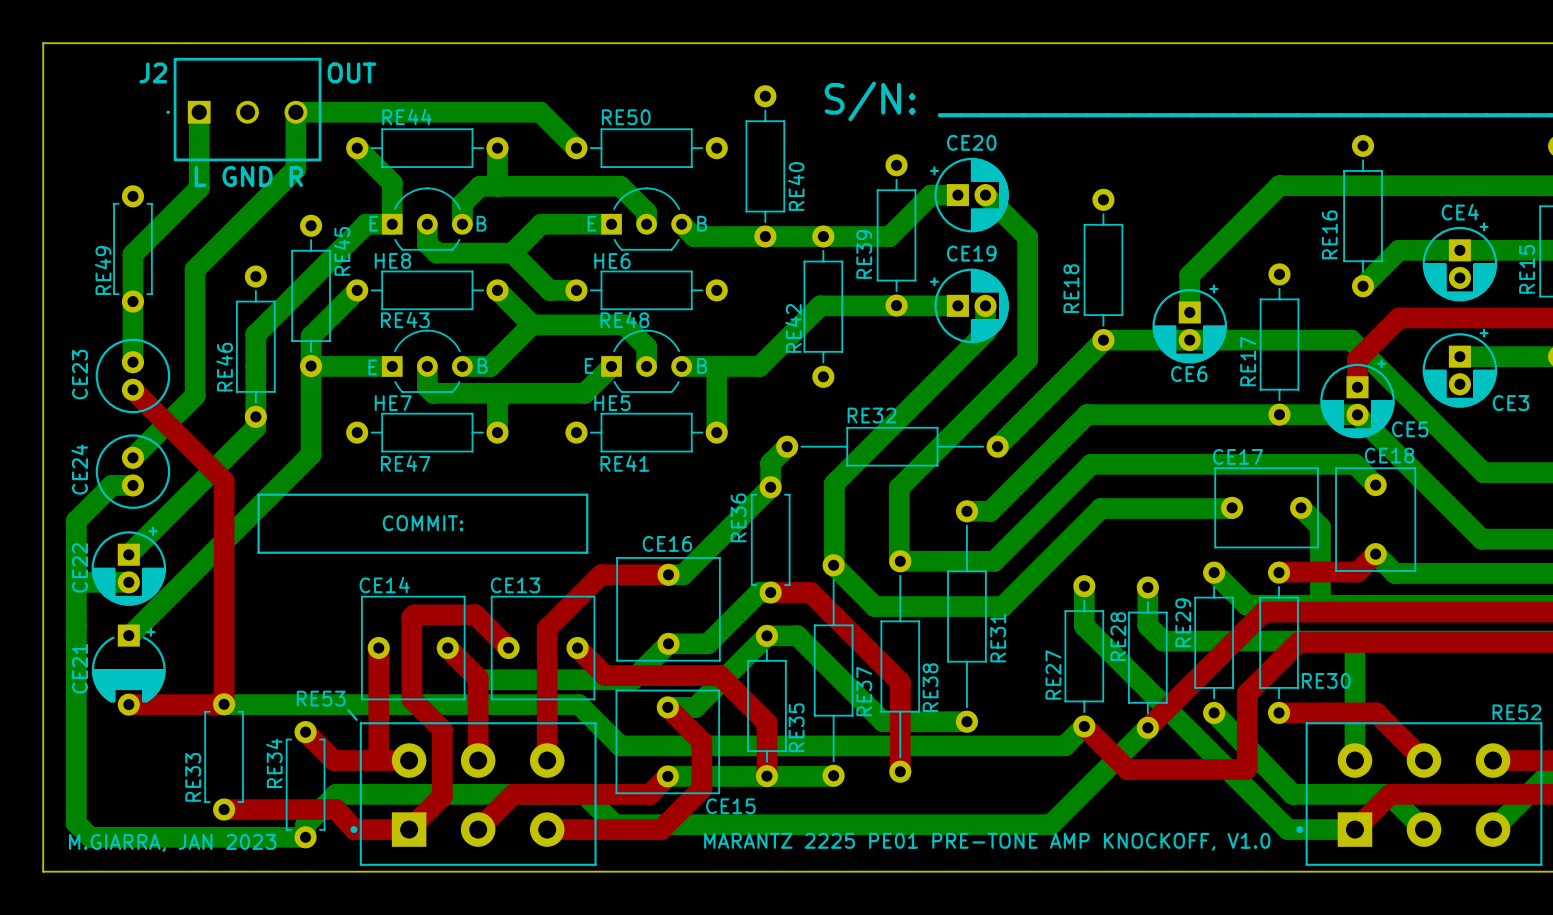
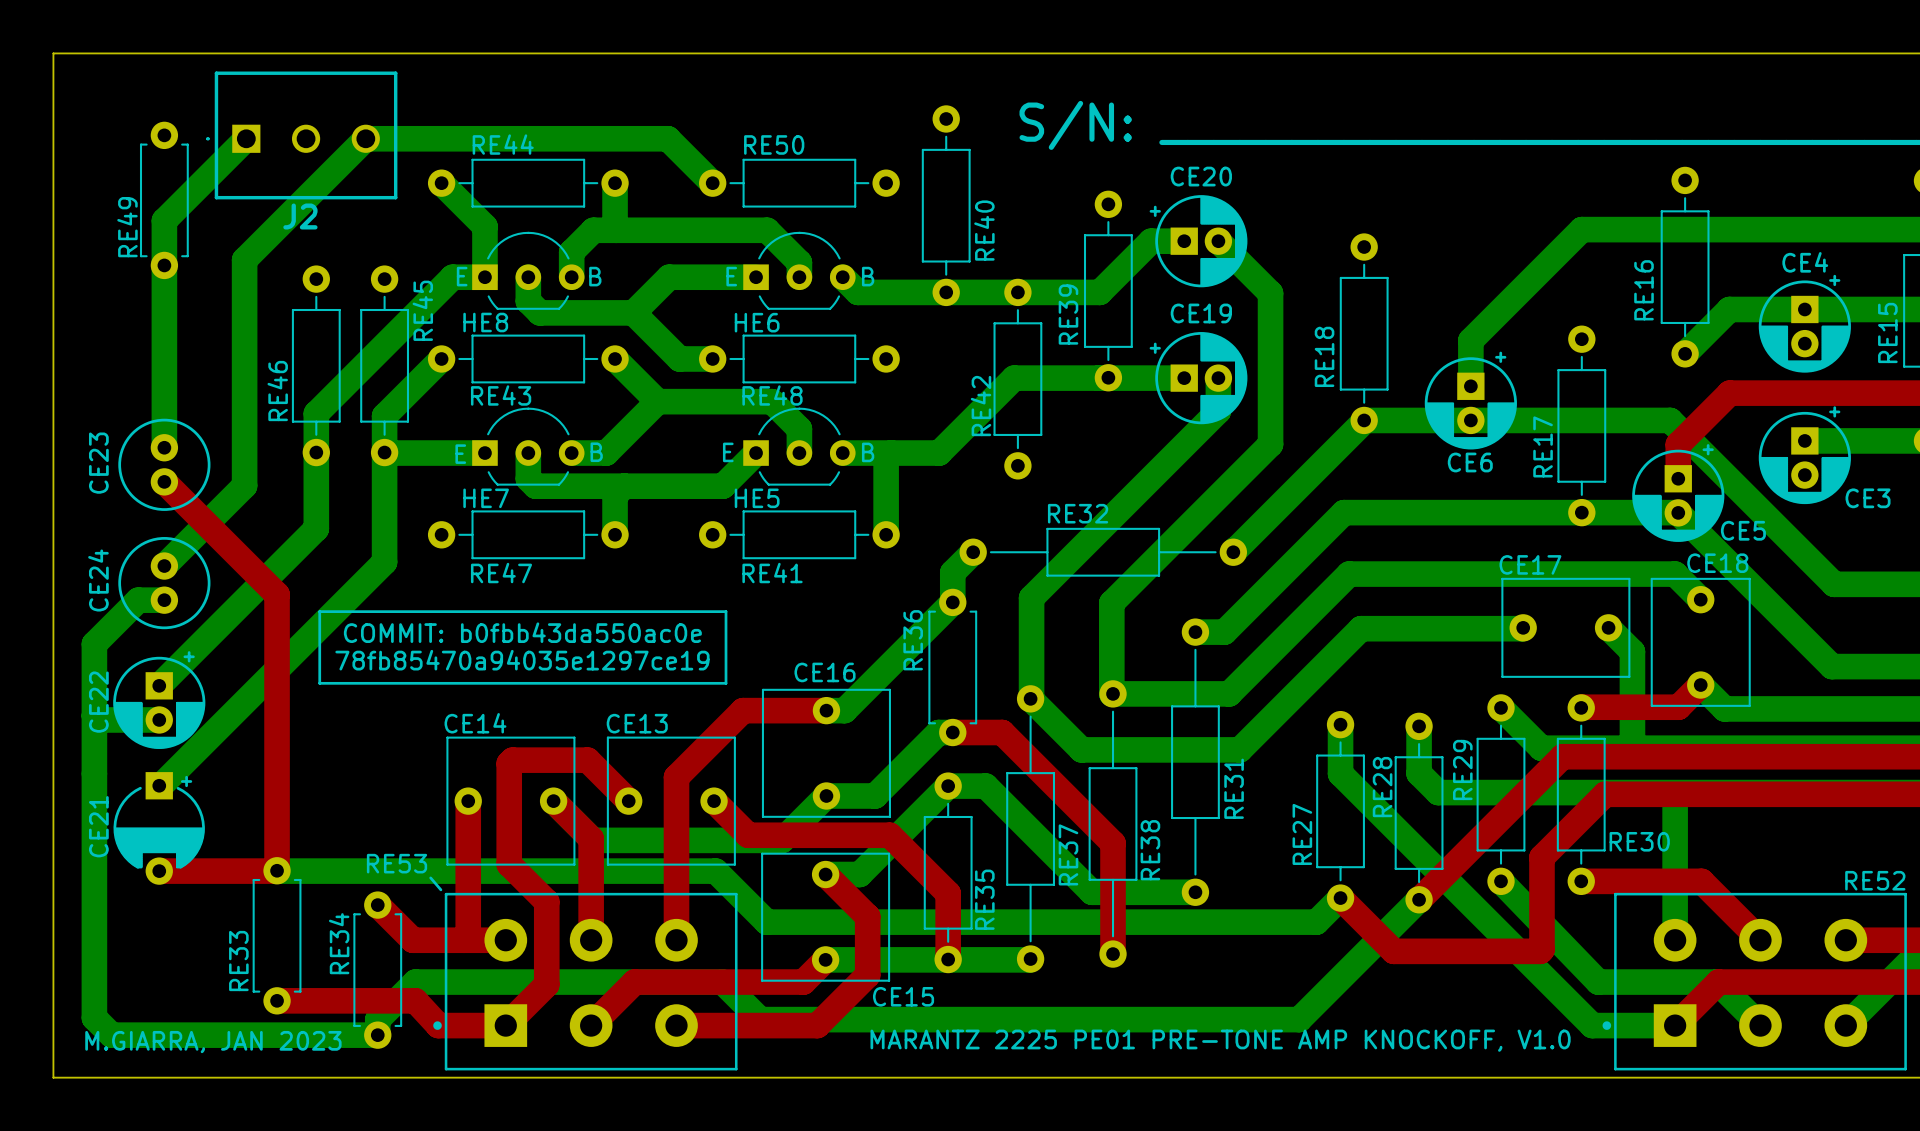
J2 name position: J2 (153, 72) -> J2 (300, 216)
text: OUT (351, 72) -> none
bottom track: (199, 112) (199, 188) (132, 254) -> (246, 138) (164, 220) (164, 314)
bottom track: (295, 112) (295, 168) (195, 269) (195, 395) -> (365, 138) (244, 259) (244, 485) (241, 489)
text: L (200, 176) -> none
text: GND (247, 176) -> none
text: R (296, 176) -> none
RE49 position: (132, 248) -> (164, 200)
RE46 position: (255, 346) -> (316, 365)
text: none -> COMMIT: b0fbb43da550ac0e (522, 632)
text: COMMIT: (422, 523) -> none
text: none -> 78fb85470a94035e1297ce19 (522, 660)

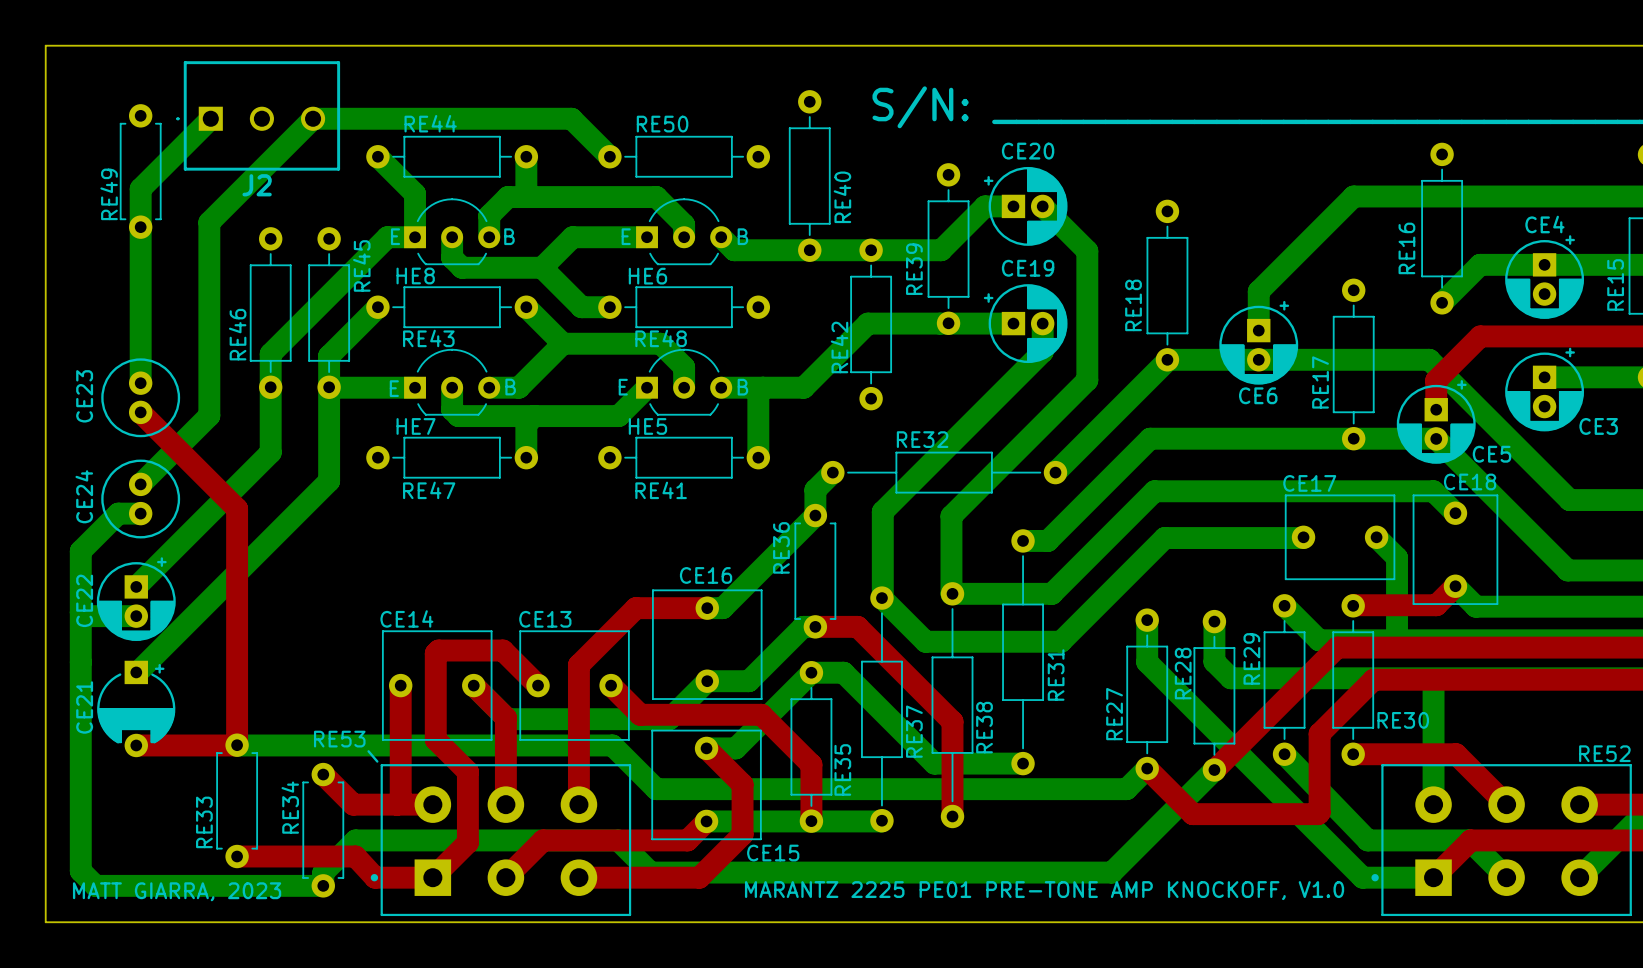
line: (319, 611) (726, 611) (726, 683) (319, 683) (319, 611) -> none
text: COMMIT: b0fbb43da550ac0e (522, 632) -> none
text: 78fb85470a94035e1297ce19 (522, 660) -> none
text: M.GIARRA, JAN 2023 (213, 1042) -> MATT GIARRA, 2023 (177, 891)

